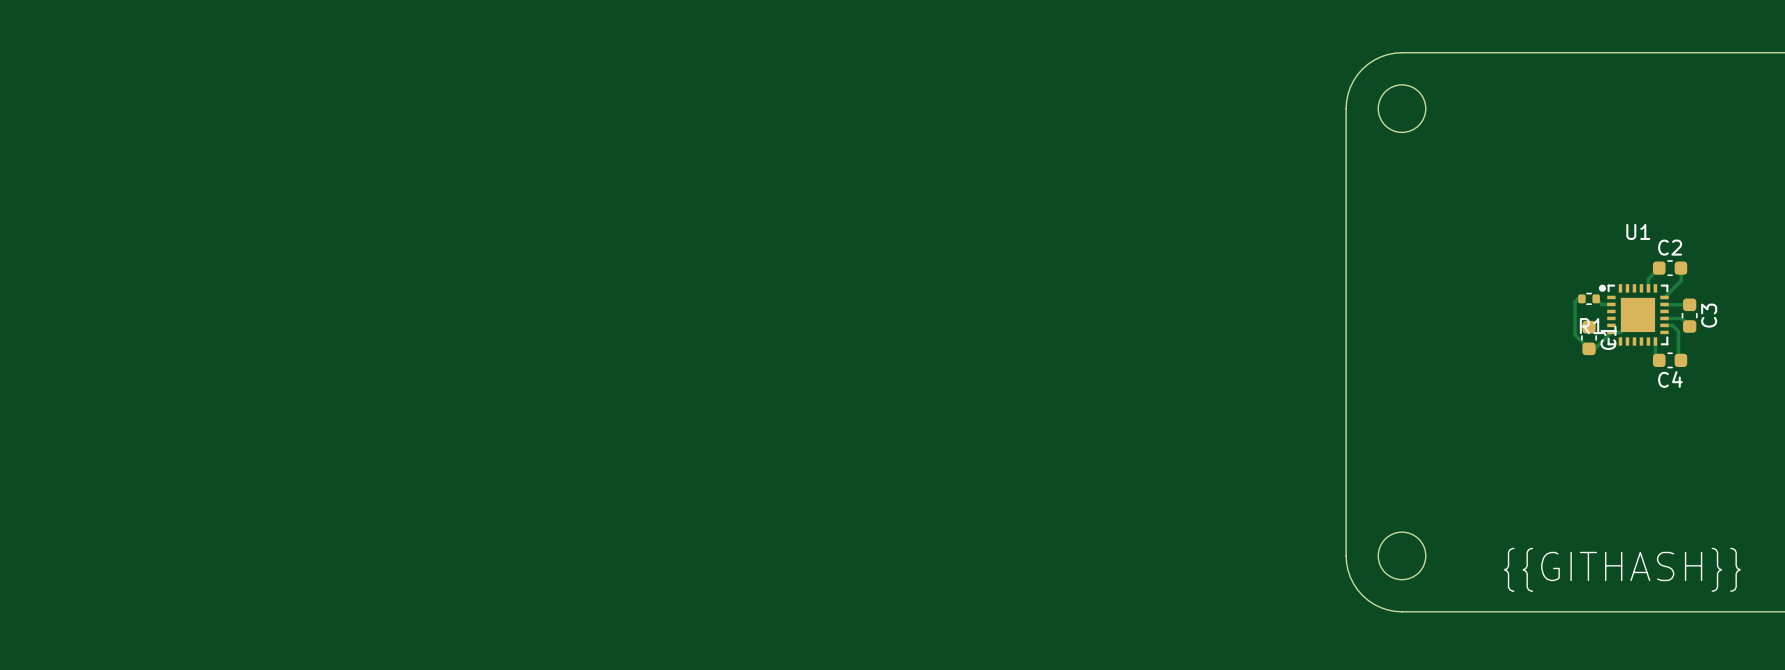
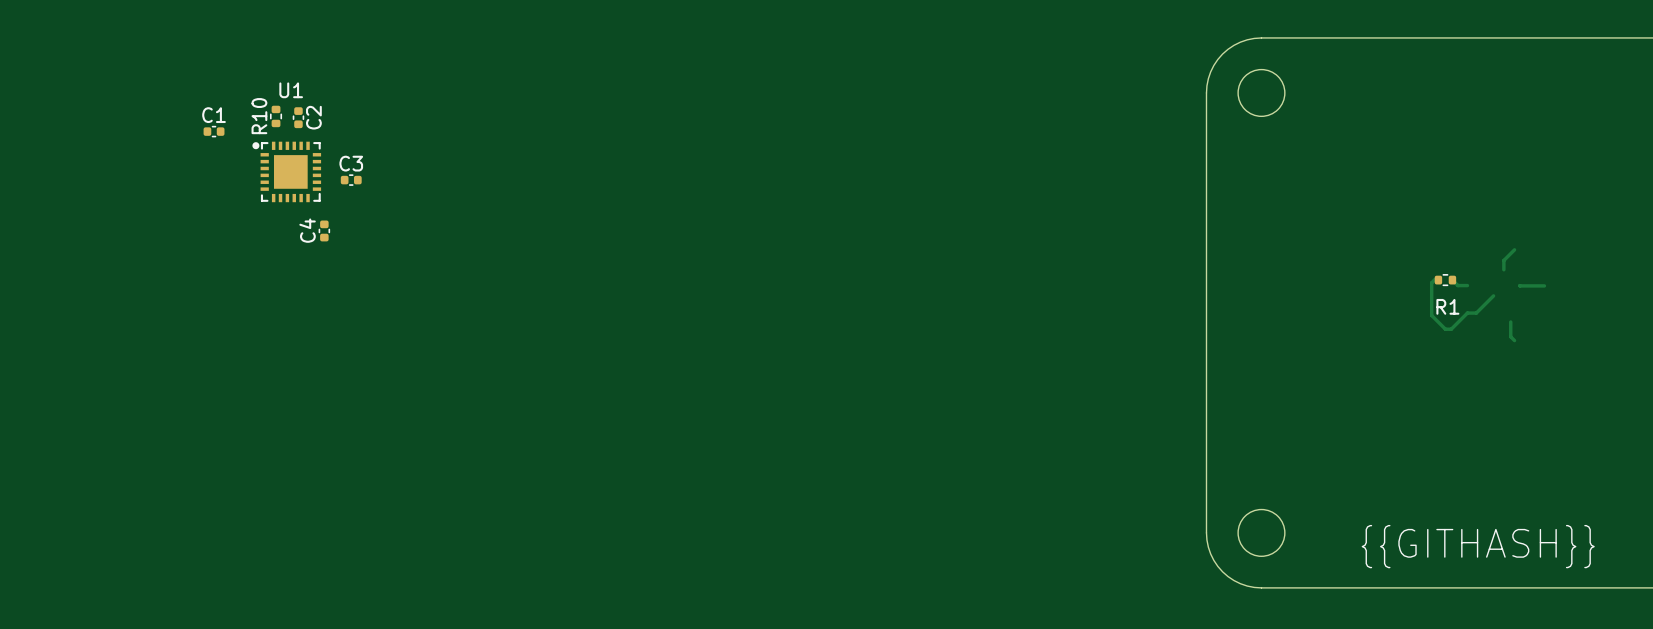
R10: none -> (276, 116)
C2 footprint: [1652, 260, 1688, 277] -> [292, 107, 305, 129]
track: (1680, 268) (1681, 280) (1664, 297) -> none
C3 footprint: [1681, 298, 1698, 333] -> [340, 174, 362, 186]
U1 position: (1633, 314) -> (286, 171)
track: (1664, 318) (1681, 318) (1689, 326) -> none
C1 footprint: [1581, 320, 1598, 356] -> [203, 125, 225, 138]
track: (1664, 325) (1672, 325) (1678, 331) (1678, 357) (1680, 360) -> none
C4 footprint: [1652, 352, 1688, 369] -> [318, 220, 331, 242]

